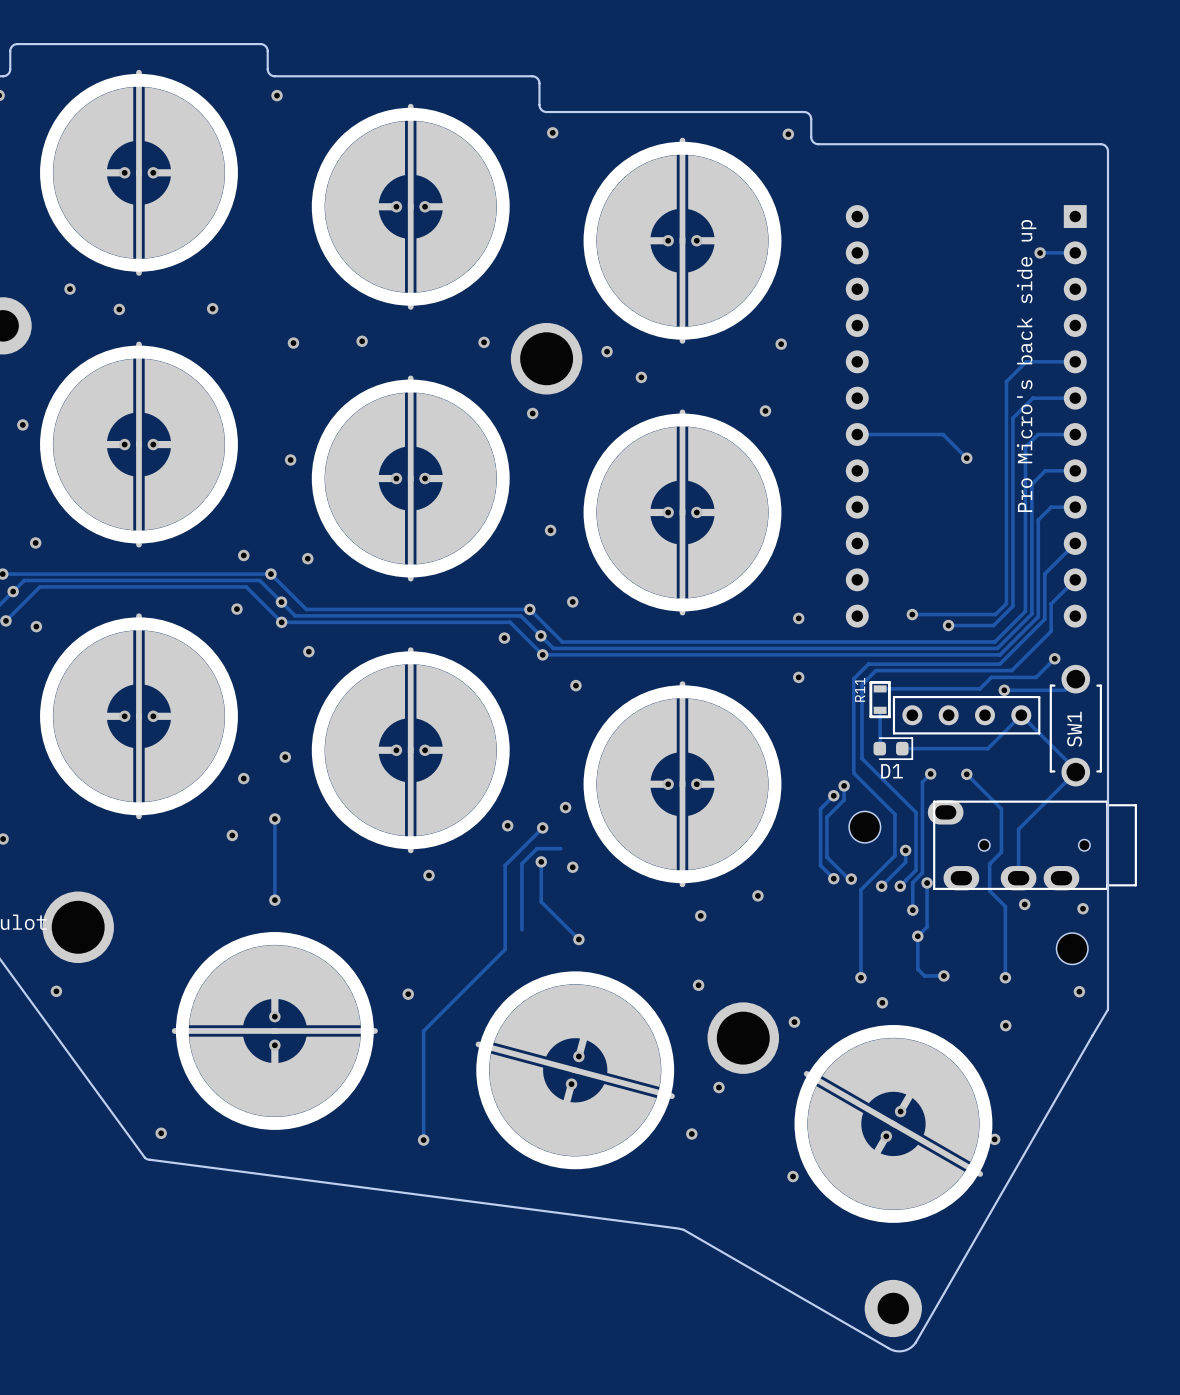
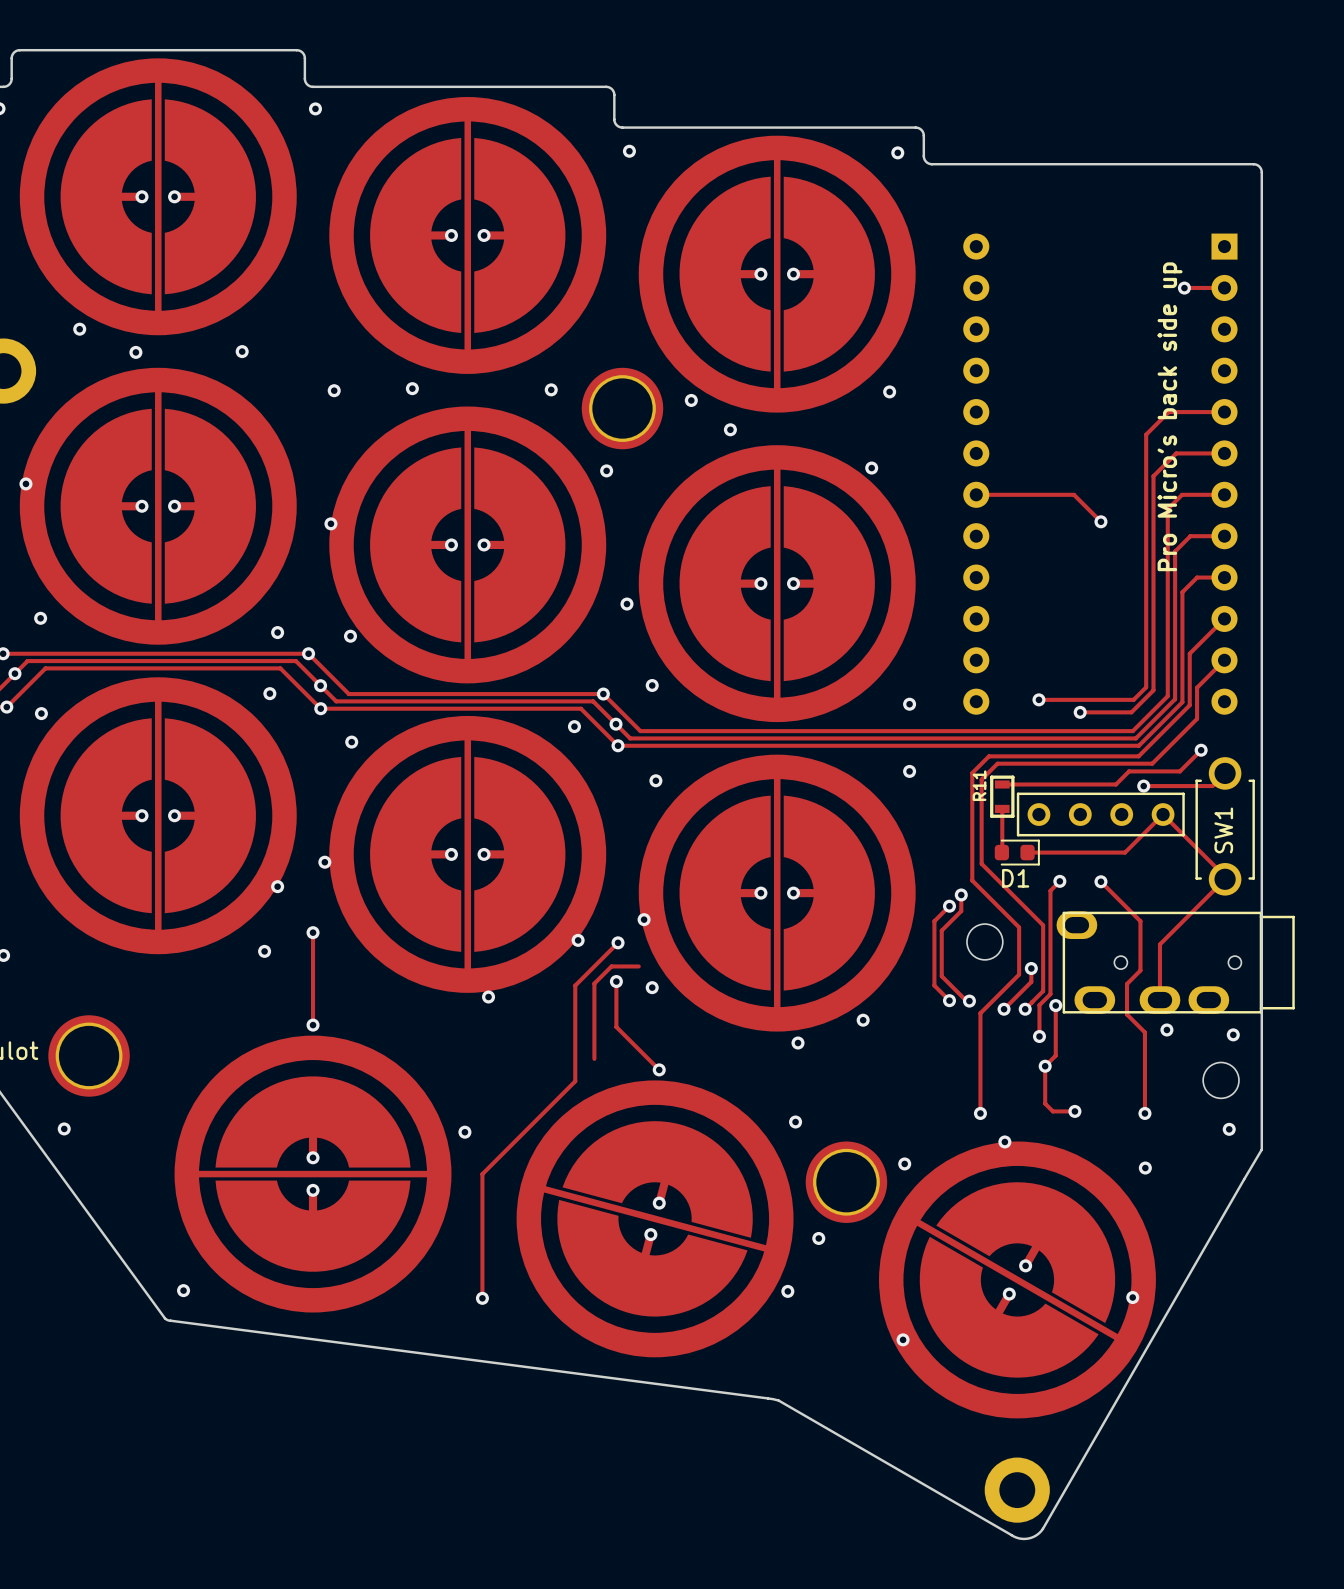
part footprint: [40, 69, 238, 276] -> [19, 58, 297, 336]
part footprint: [311, 103, 510, 310] -> [329, 97, 607, 374]
part footprint: [583, 137, 782, 344] -> [638, 135, 916, 413]
part footprint: [40, 341, 238, 548] -> [19, 367, 297, 645]
part footprint: [311, 375, 510, 582] -> [329, 406, 607, 684]
part footprint: [583, 409, 782, 616] -> [638, 445, 916, 723]
part footprint: [40, 613, 238, 820] -> [19, 677, 297, 955]
part footprint: [311, 647, 510, 854] -> [329, 715, 607, 993]
part footprint: [583, 681, 782, 888] -> [638, 754, 916, 1032]
part footprint: [171, 932, 378, 1130] -> [174, 1035, 452, 1313]
part footprint: [475, 971, 675, 1170] -> [516, 1080, 794, 1358]
part footprint: [794, 1025, 993, 1223] -> [879, 1141, 1156, 1419]

